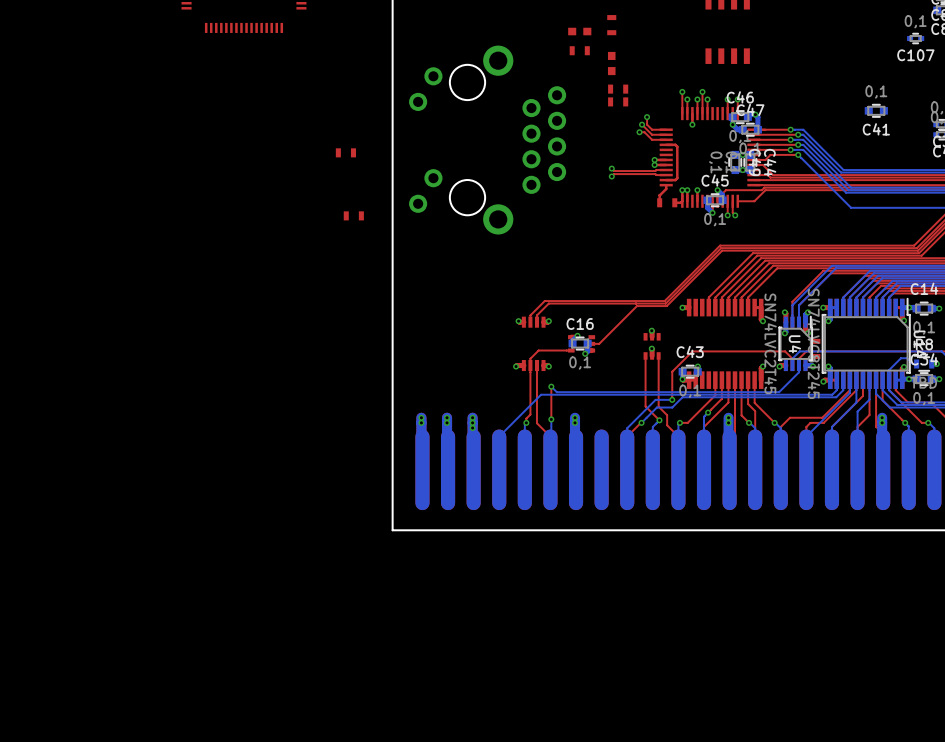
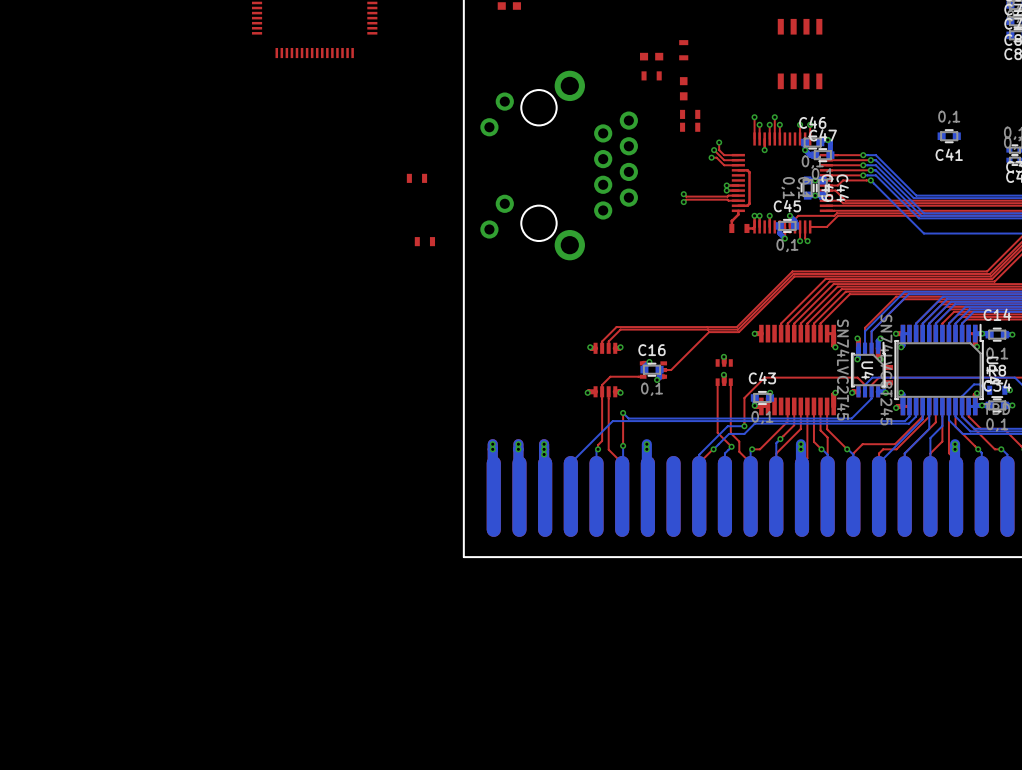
C107: 0,1 (915, 38) -> none

